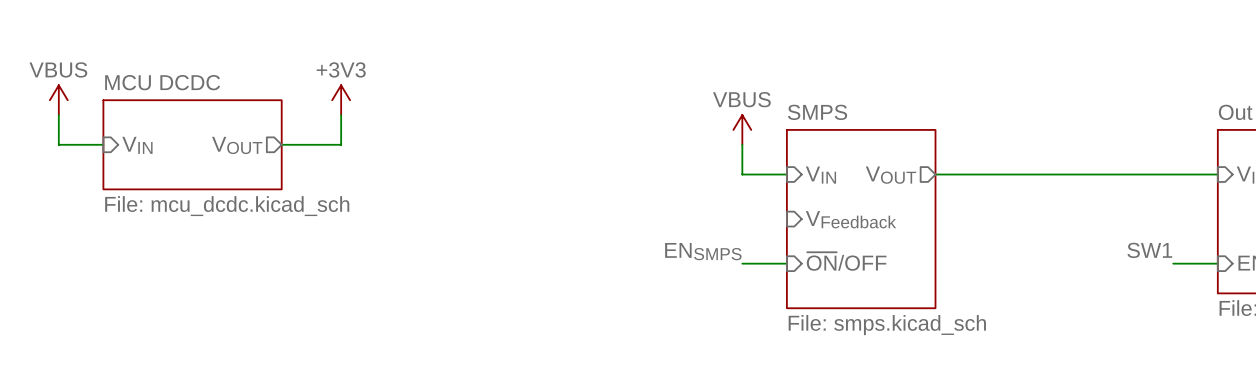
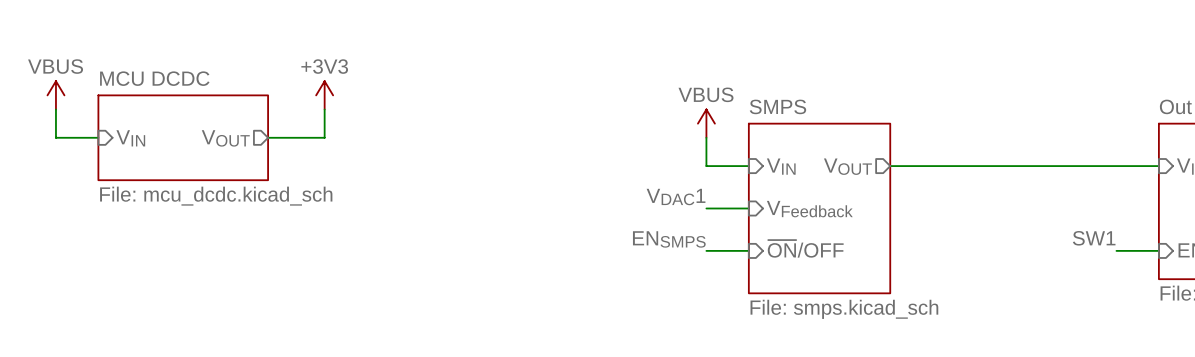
label: none -> VDAC1 (676, 197)
wire: none -> (706, 208) (748, 208)

